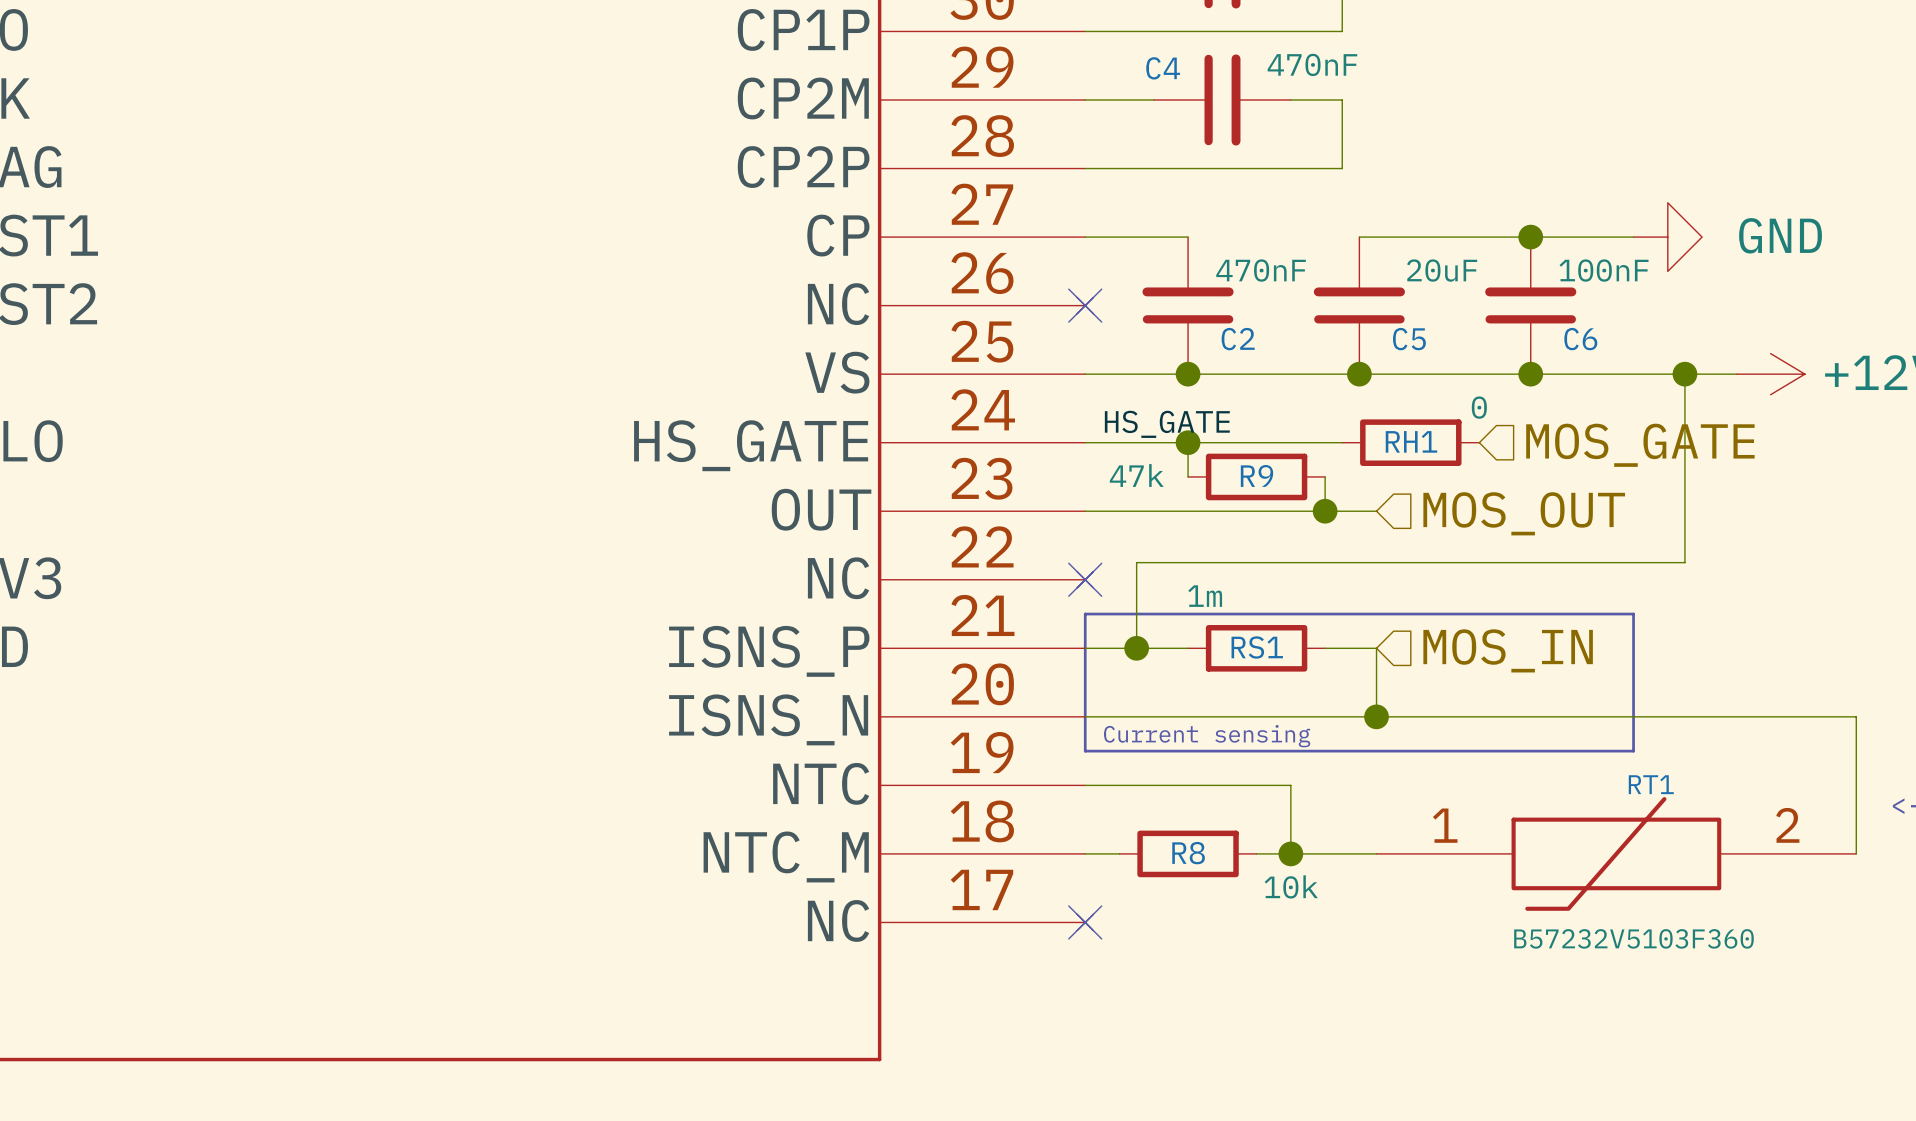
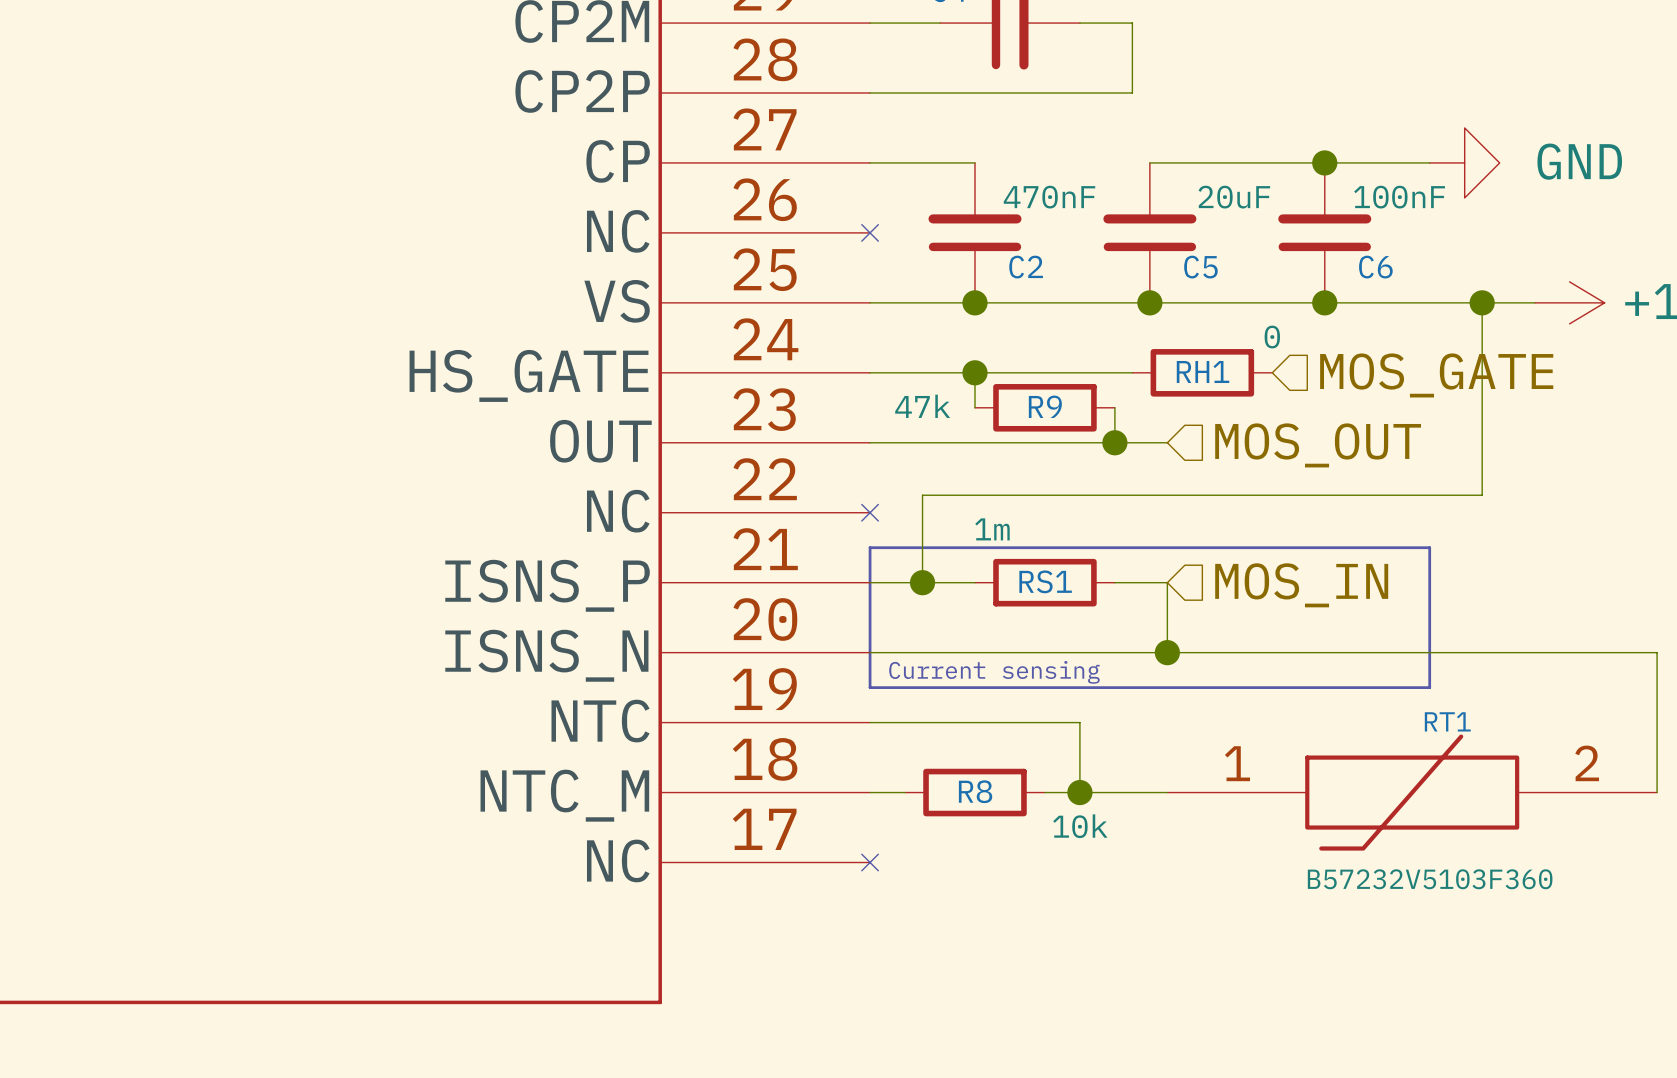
no-connect mark: (1085, 305) -> none
label: HS_GATE (1167, 424) -> none
no-connect mark: (1085, 579) -> none
no-connect mark: (1085, 922) -> none

